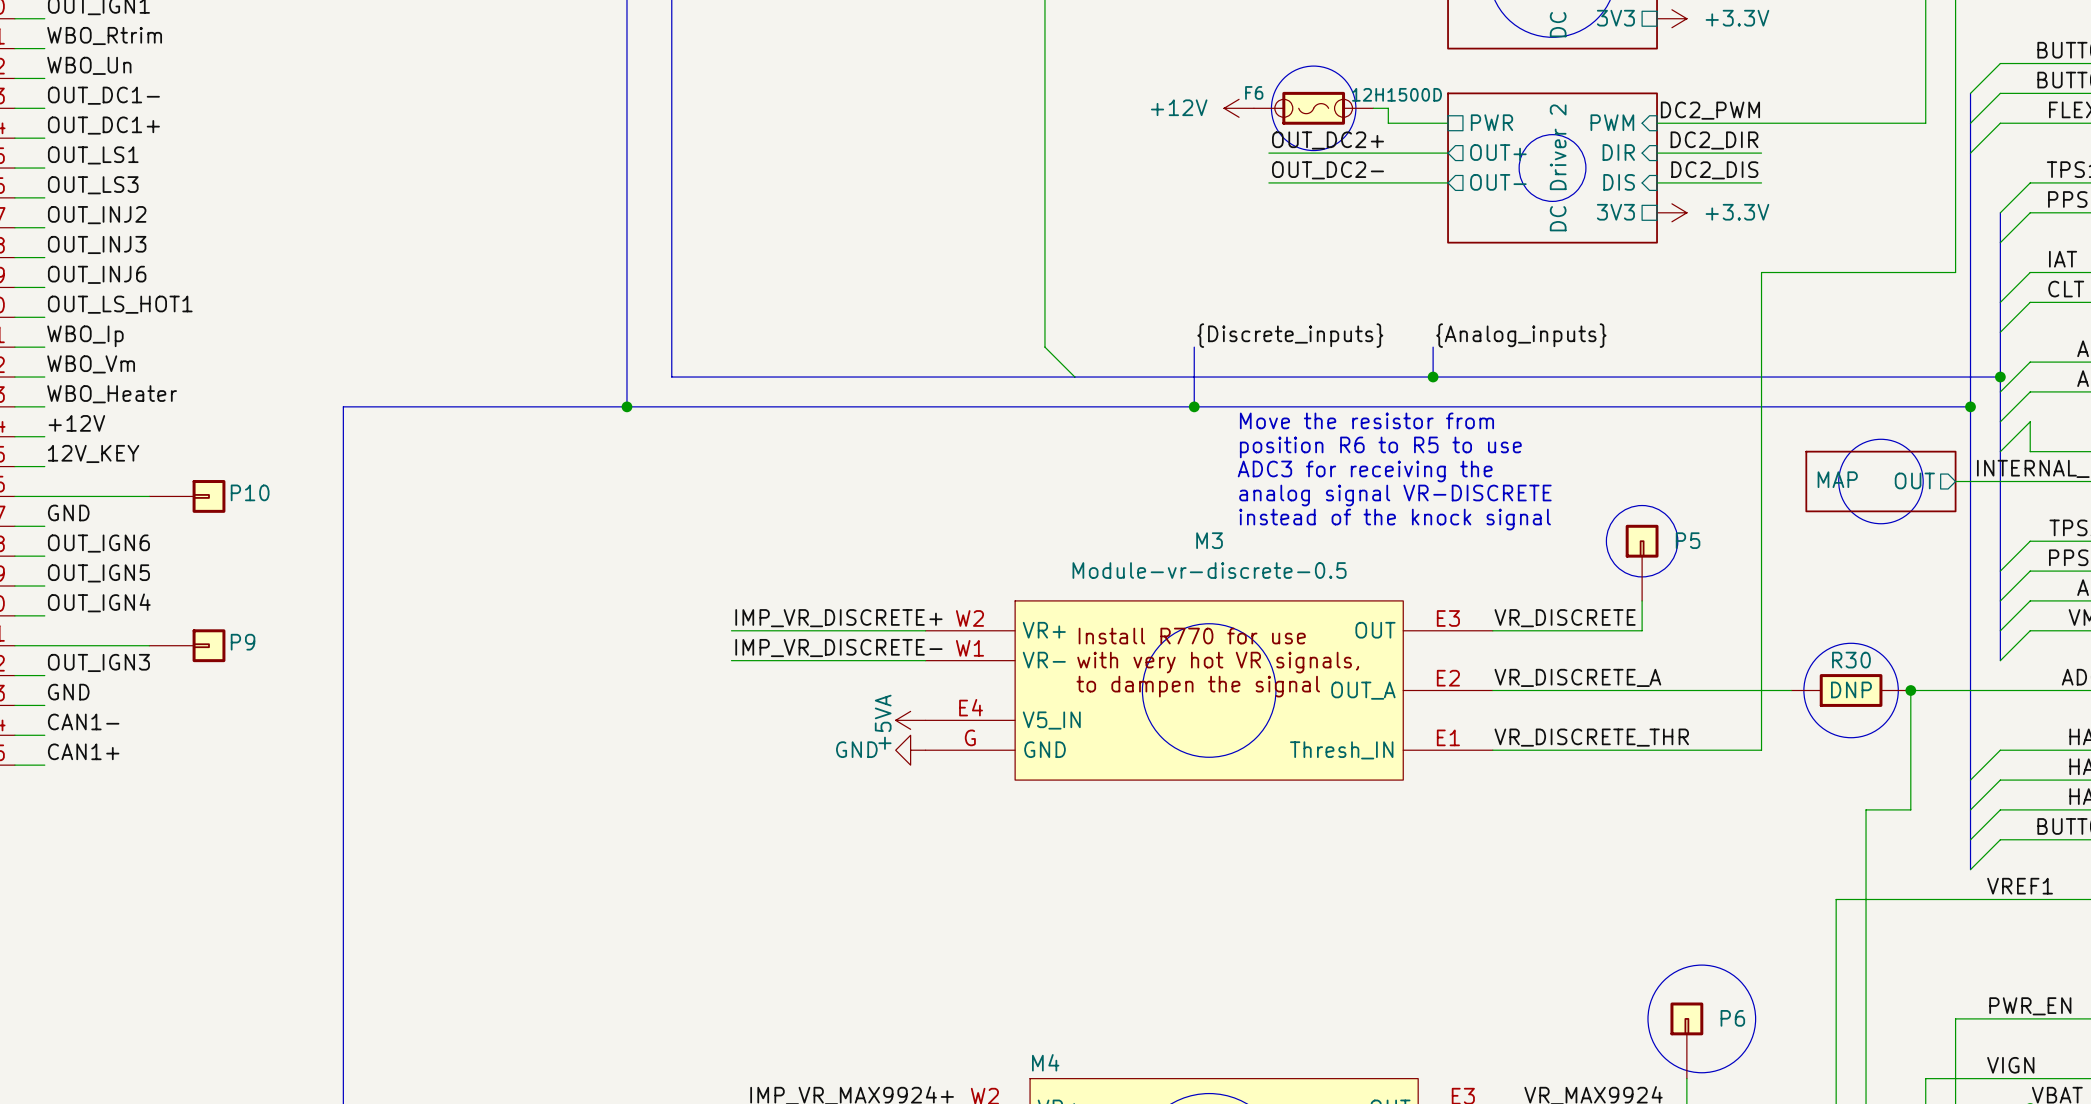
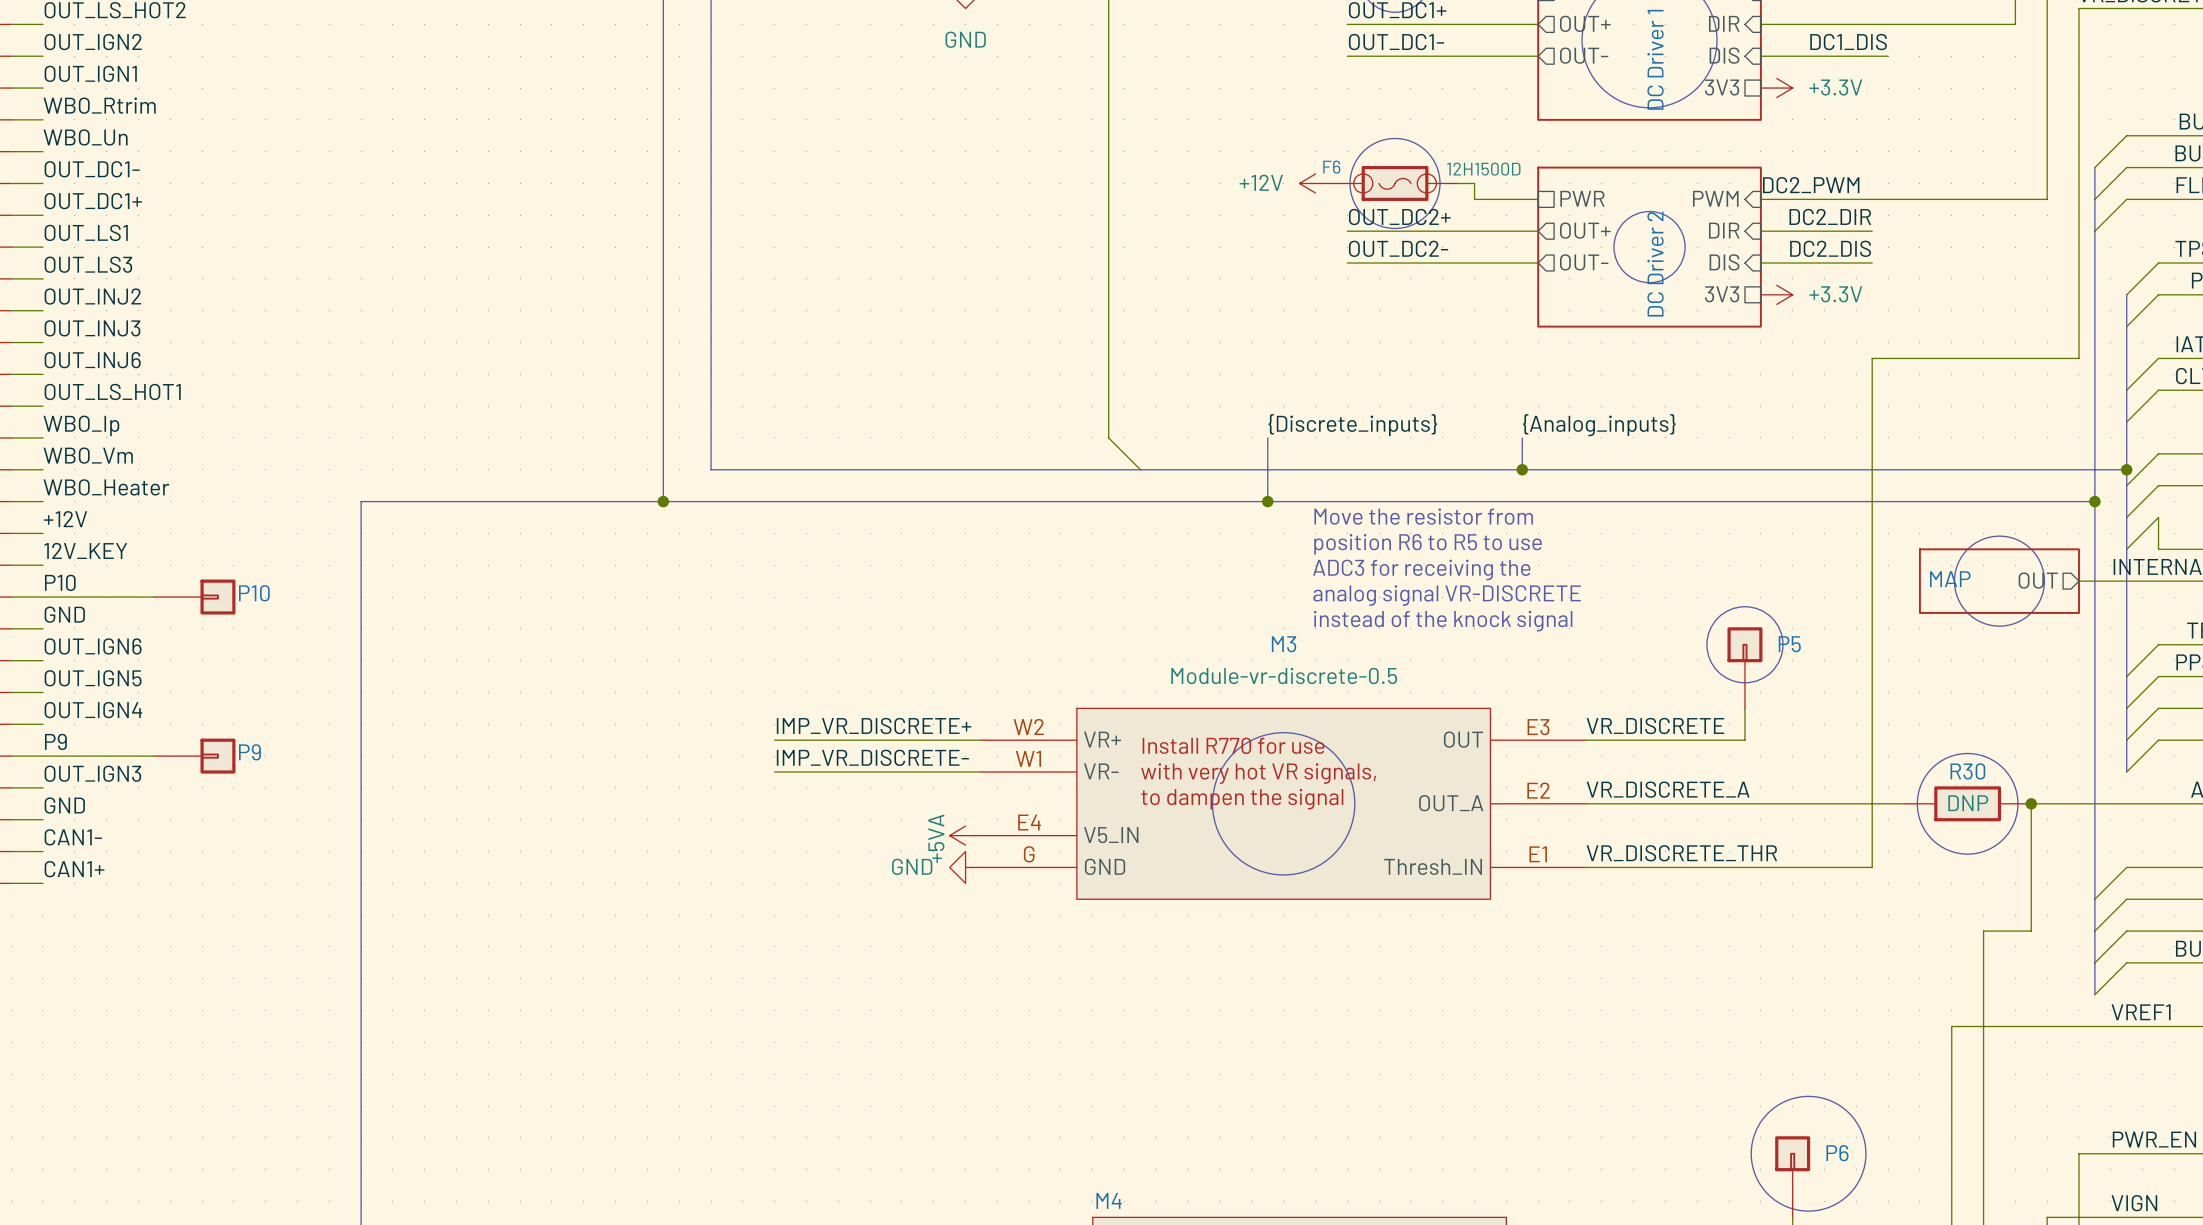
label: none -> P10 (60, 582)
label: none -> P9 (55, 741)

